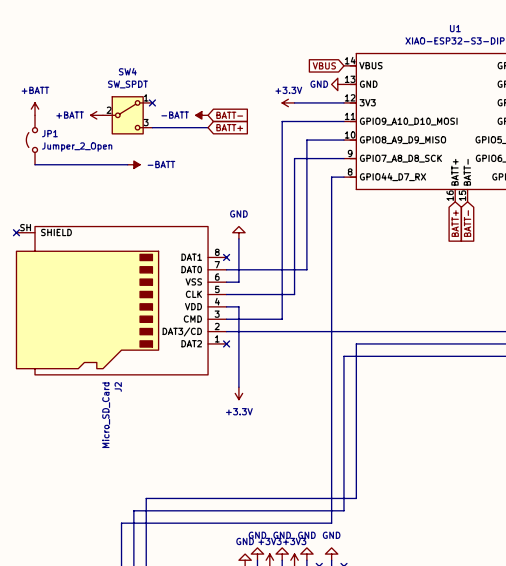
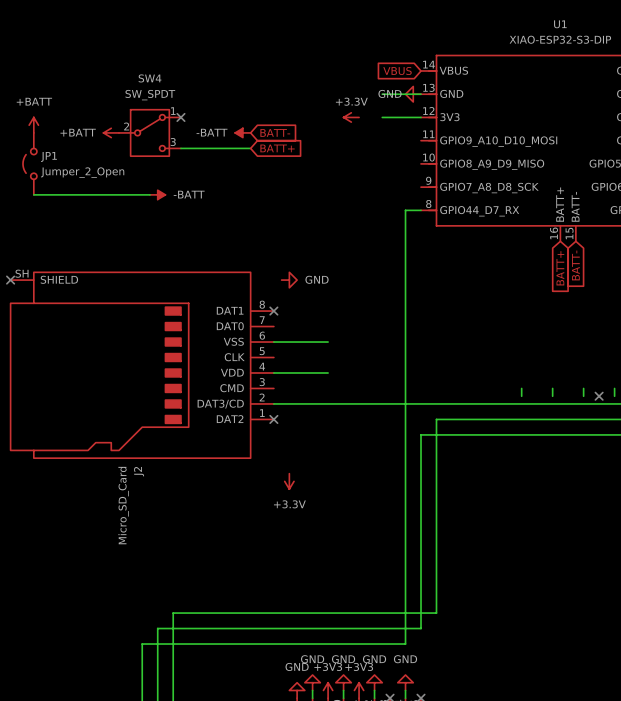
wire: none -> (382, 94) (421, 94)
wire: (294, 102) (313, 102) -> none
wire: (343, 121) (282, 121) (282, 319) (226, 319) -> none
wire: (343, 140) (306, 140) (306, 269) (226, 269) -> none
wire: (343, 158) (294, 158) (294, 294) (226, 294) -> none
power symbol rotation: 0° (238, 232) -> 90° clockwise (289, 280)
wire: (238, 238) (238, 282) -> (328, 342) (289, 342)
wire: (238, 306) (238, 387) -> (289, 372) (328, 372)
wire: none -> (521, 388) (521, 396)
wire: none -> (552, 388) (552, 396)
wire: none -> (583, 388) (583, 396)
wire: none -> (614, 388) (614, 396)
no-connect mark: none -> (599, 396)

